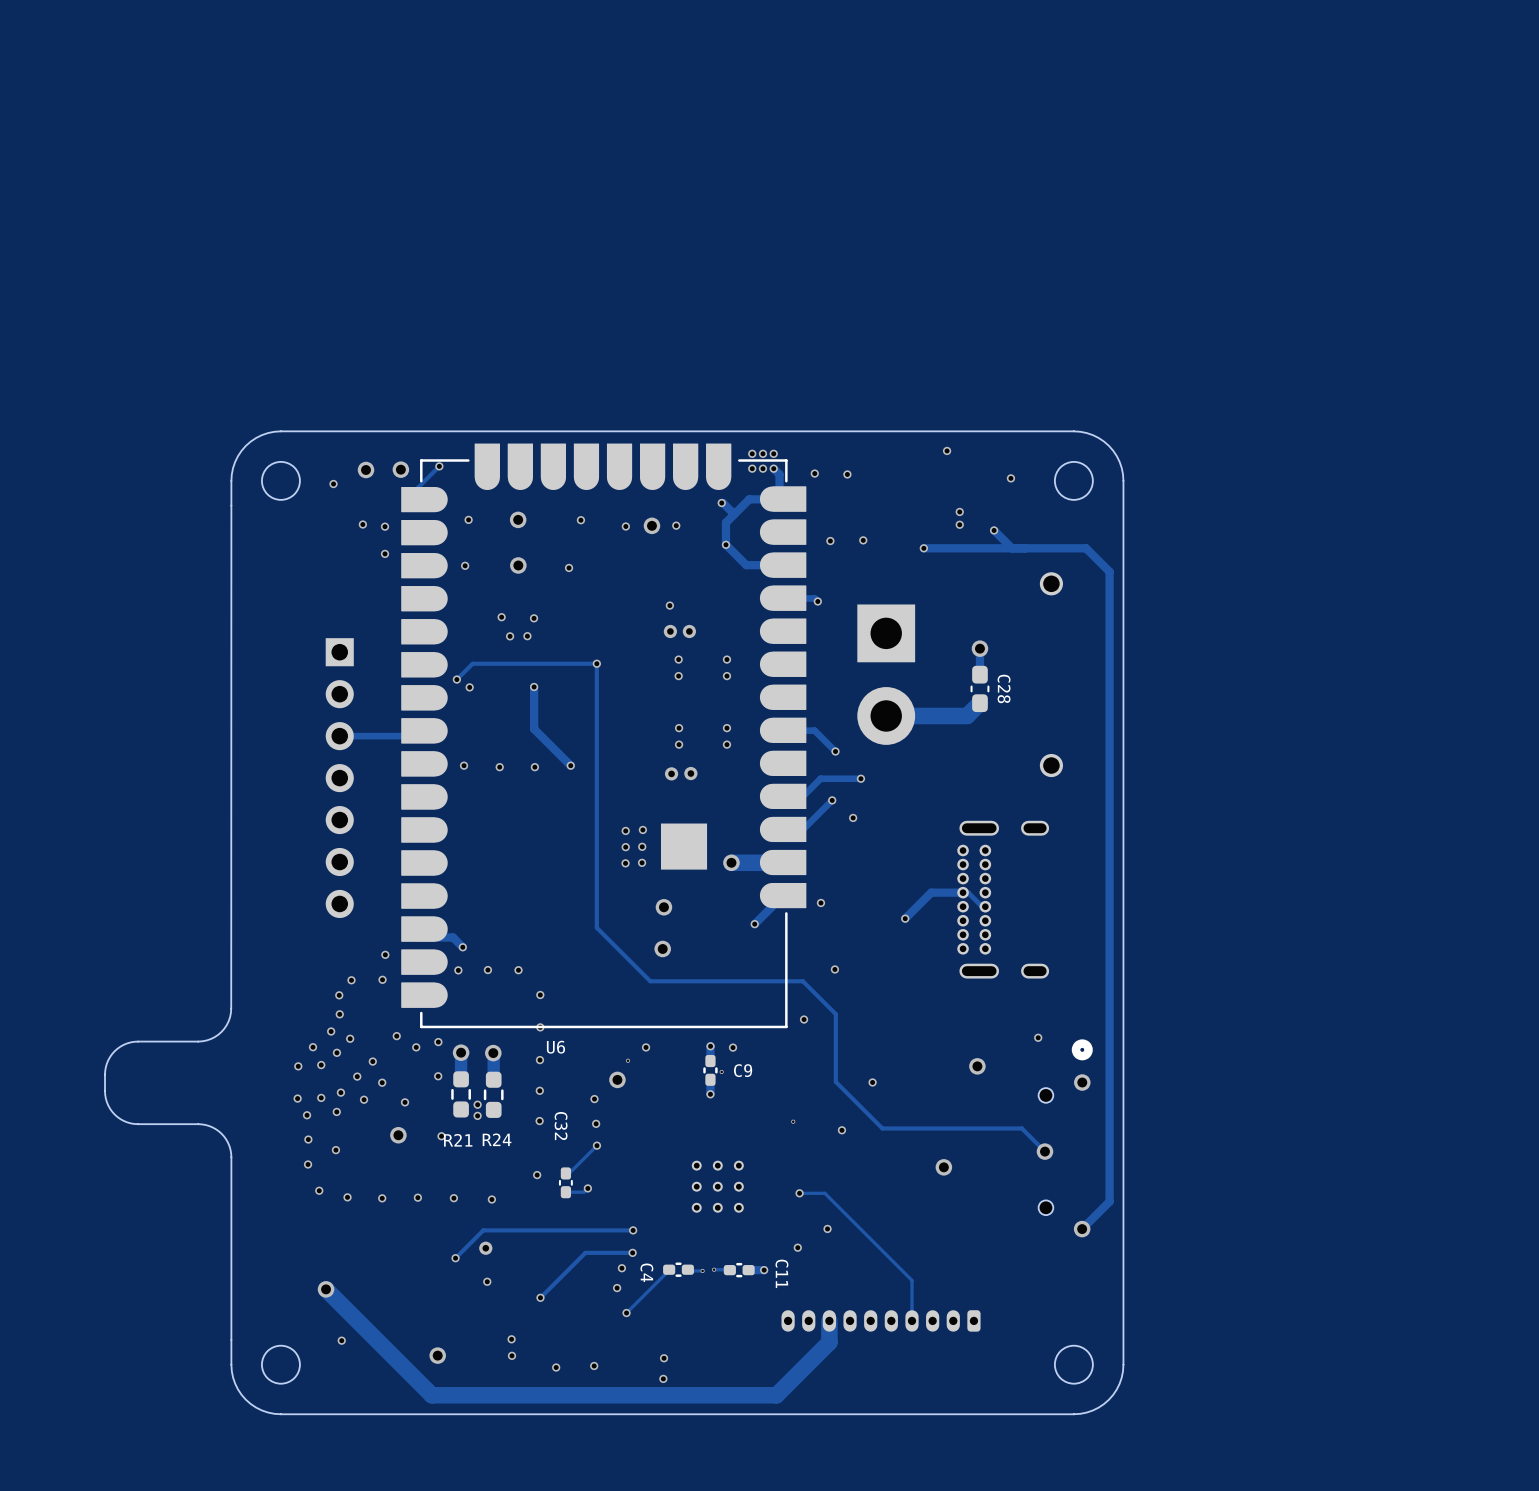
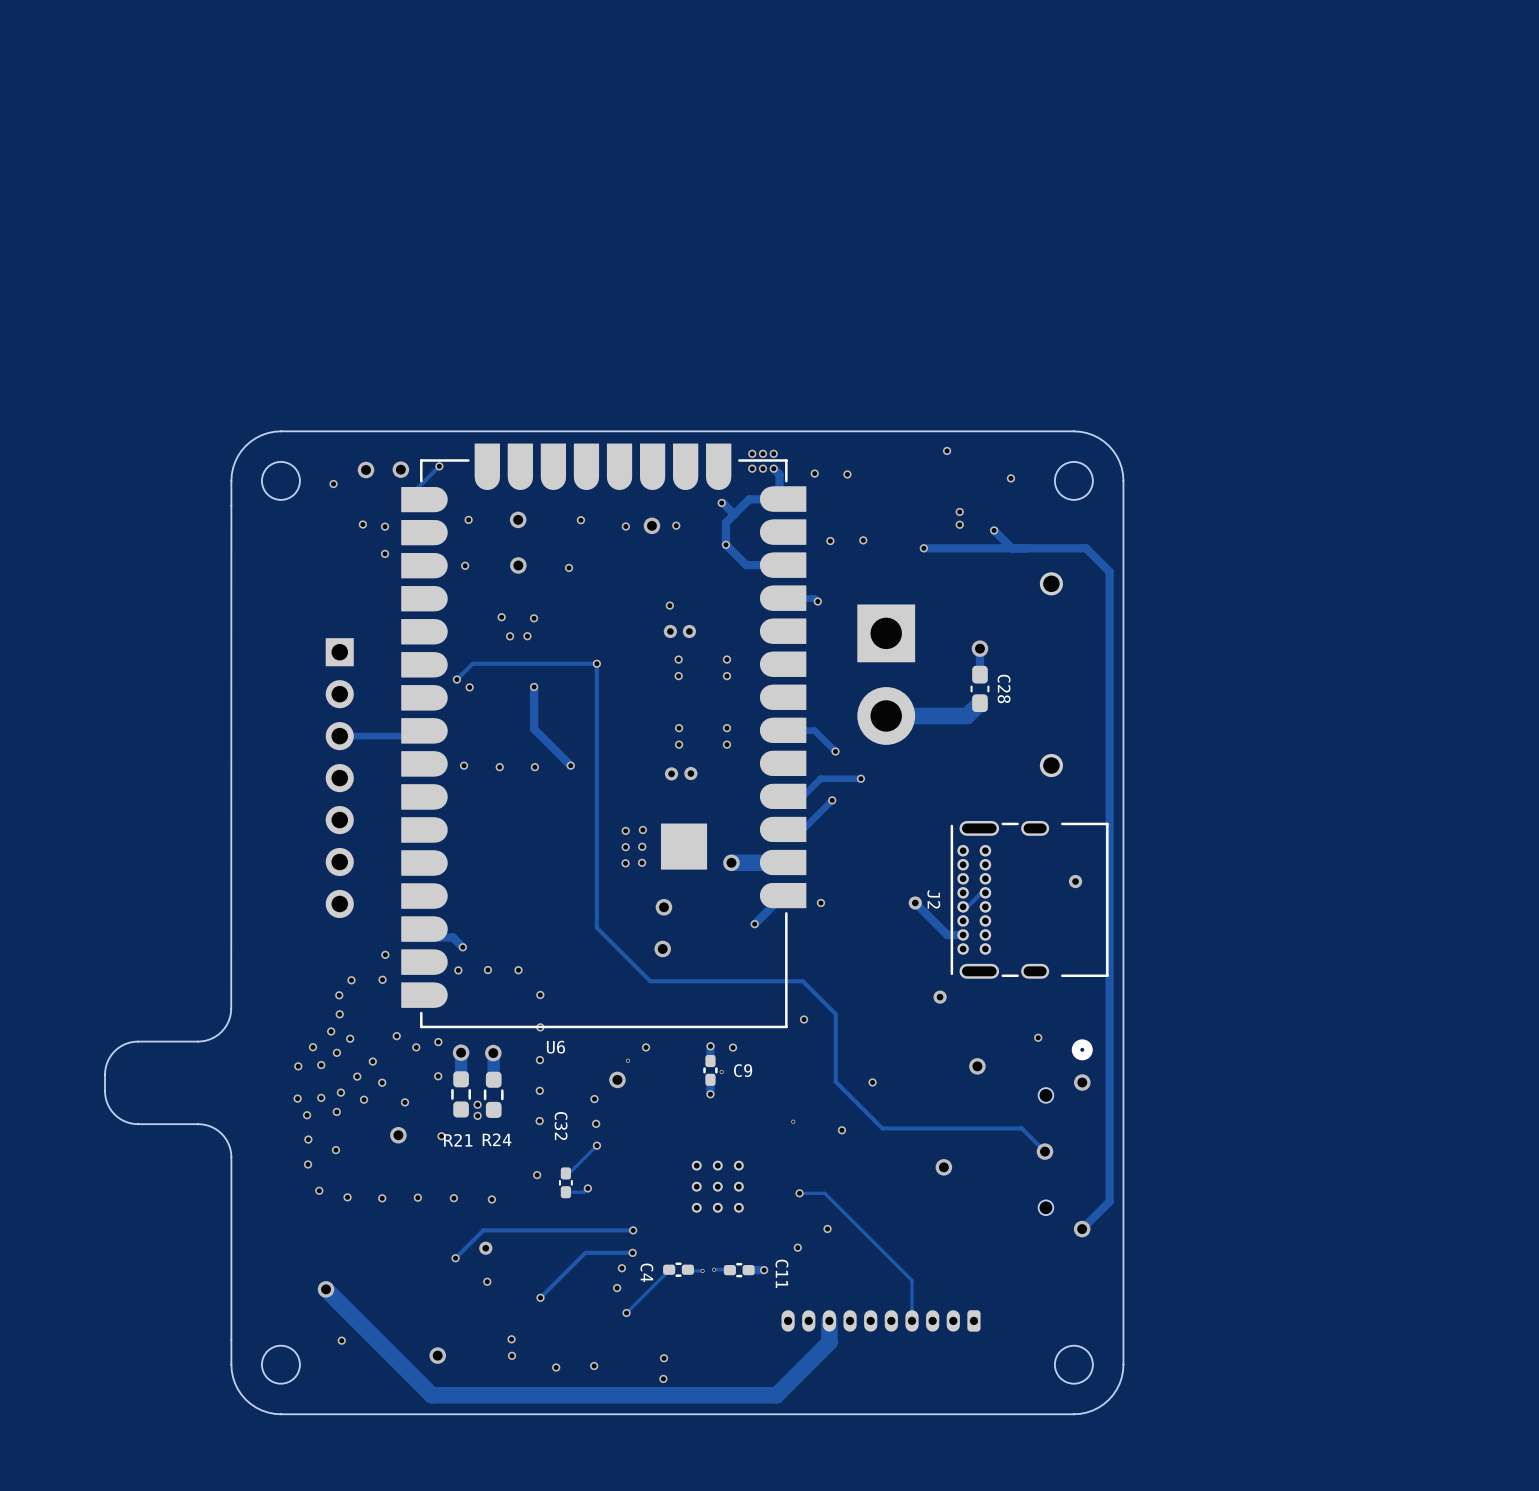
via: (853, 817) -> none
via: none -> (1075, 881)
track: none -> (985, 892) (981, 892) (967, 906) (963, 906)
J2 side: top (1003, 899) -> bottom (1029, 899)
track: none -> (915, 902) (947, 934) (963, 934)
via: none -> (915, 902)
track: (985, 906) (982, 906) (968, 892) (931, 892) (905, 918) -> none
via: (905, 918) -> none
via: (834, 969) -> none
via: none -> (940, 997)

